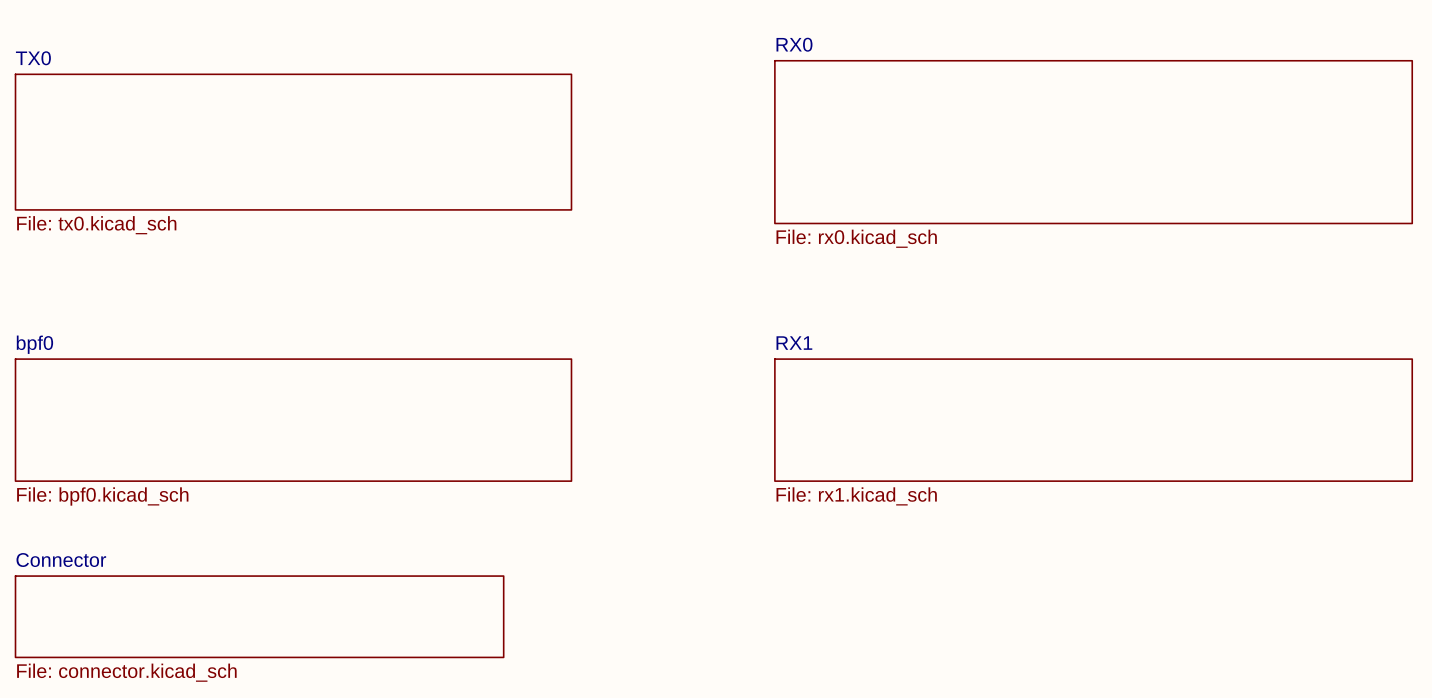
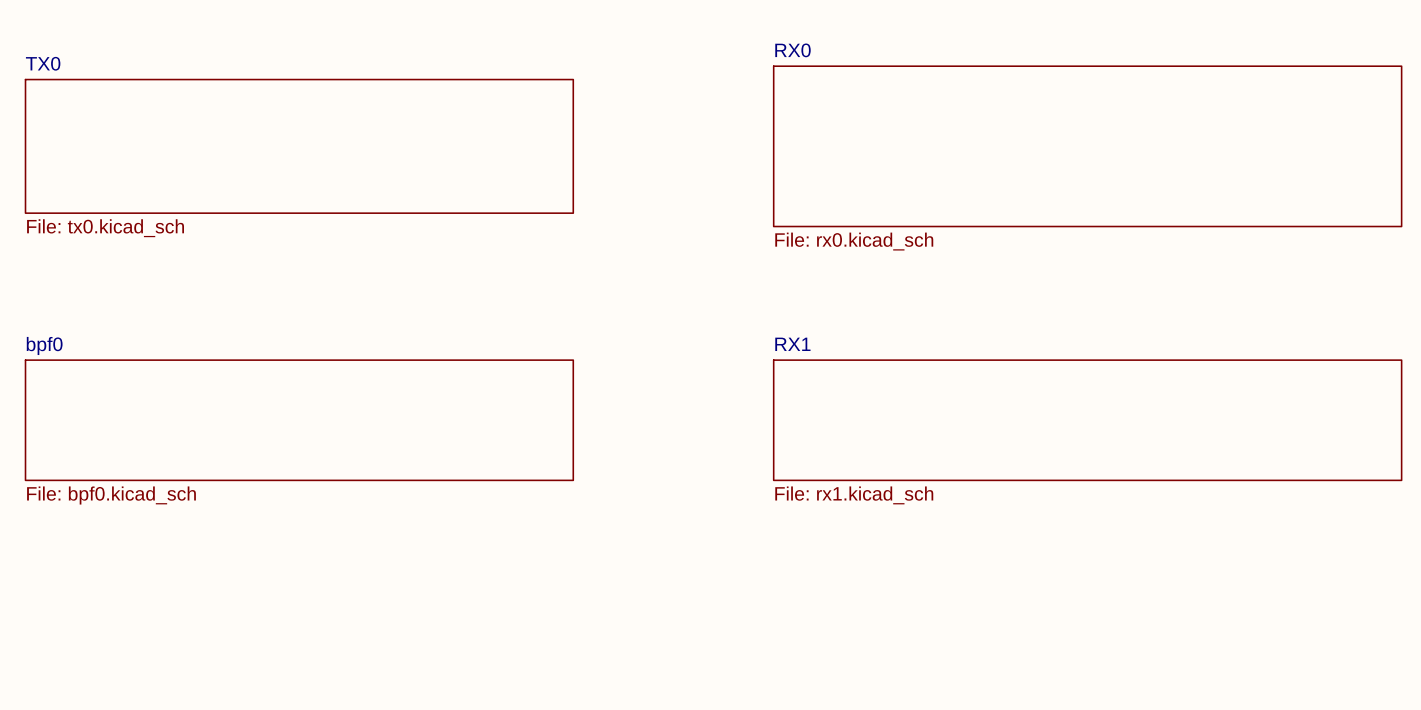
sheet Connector: File: connector.kicad_sch (259, 616) -> none

